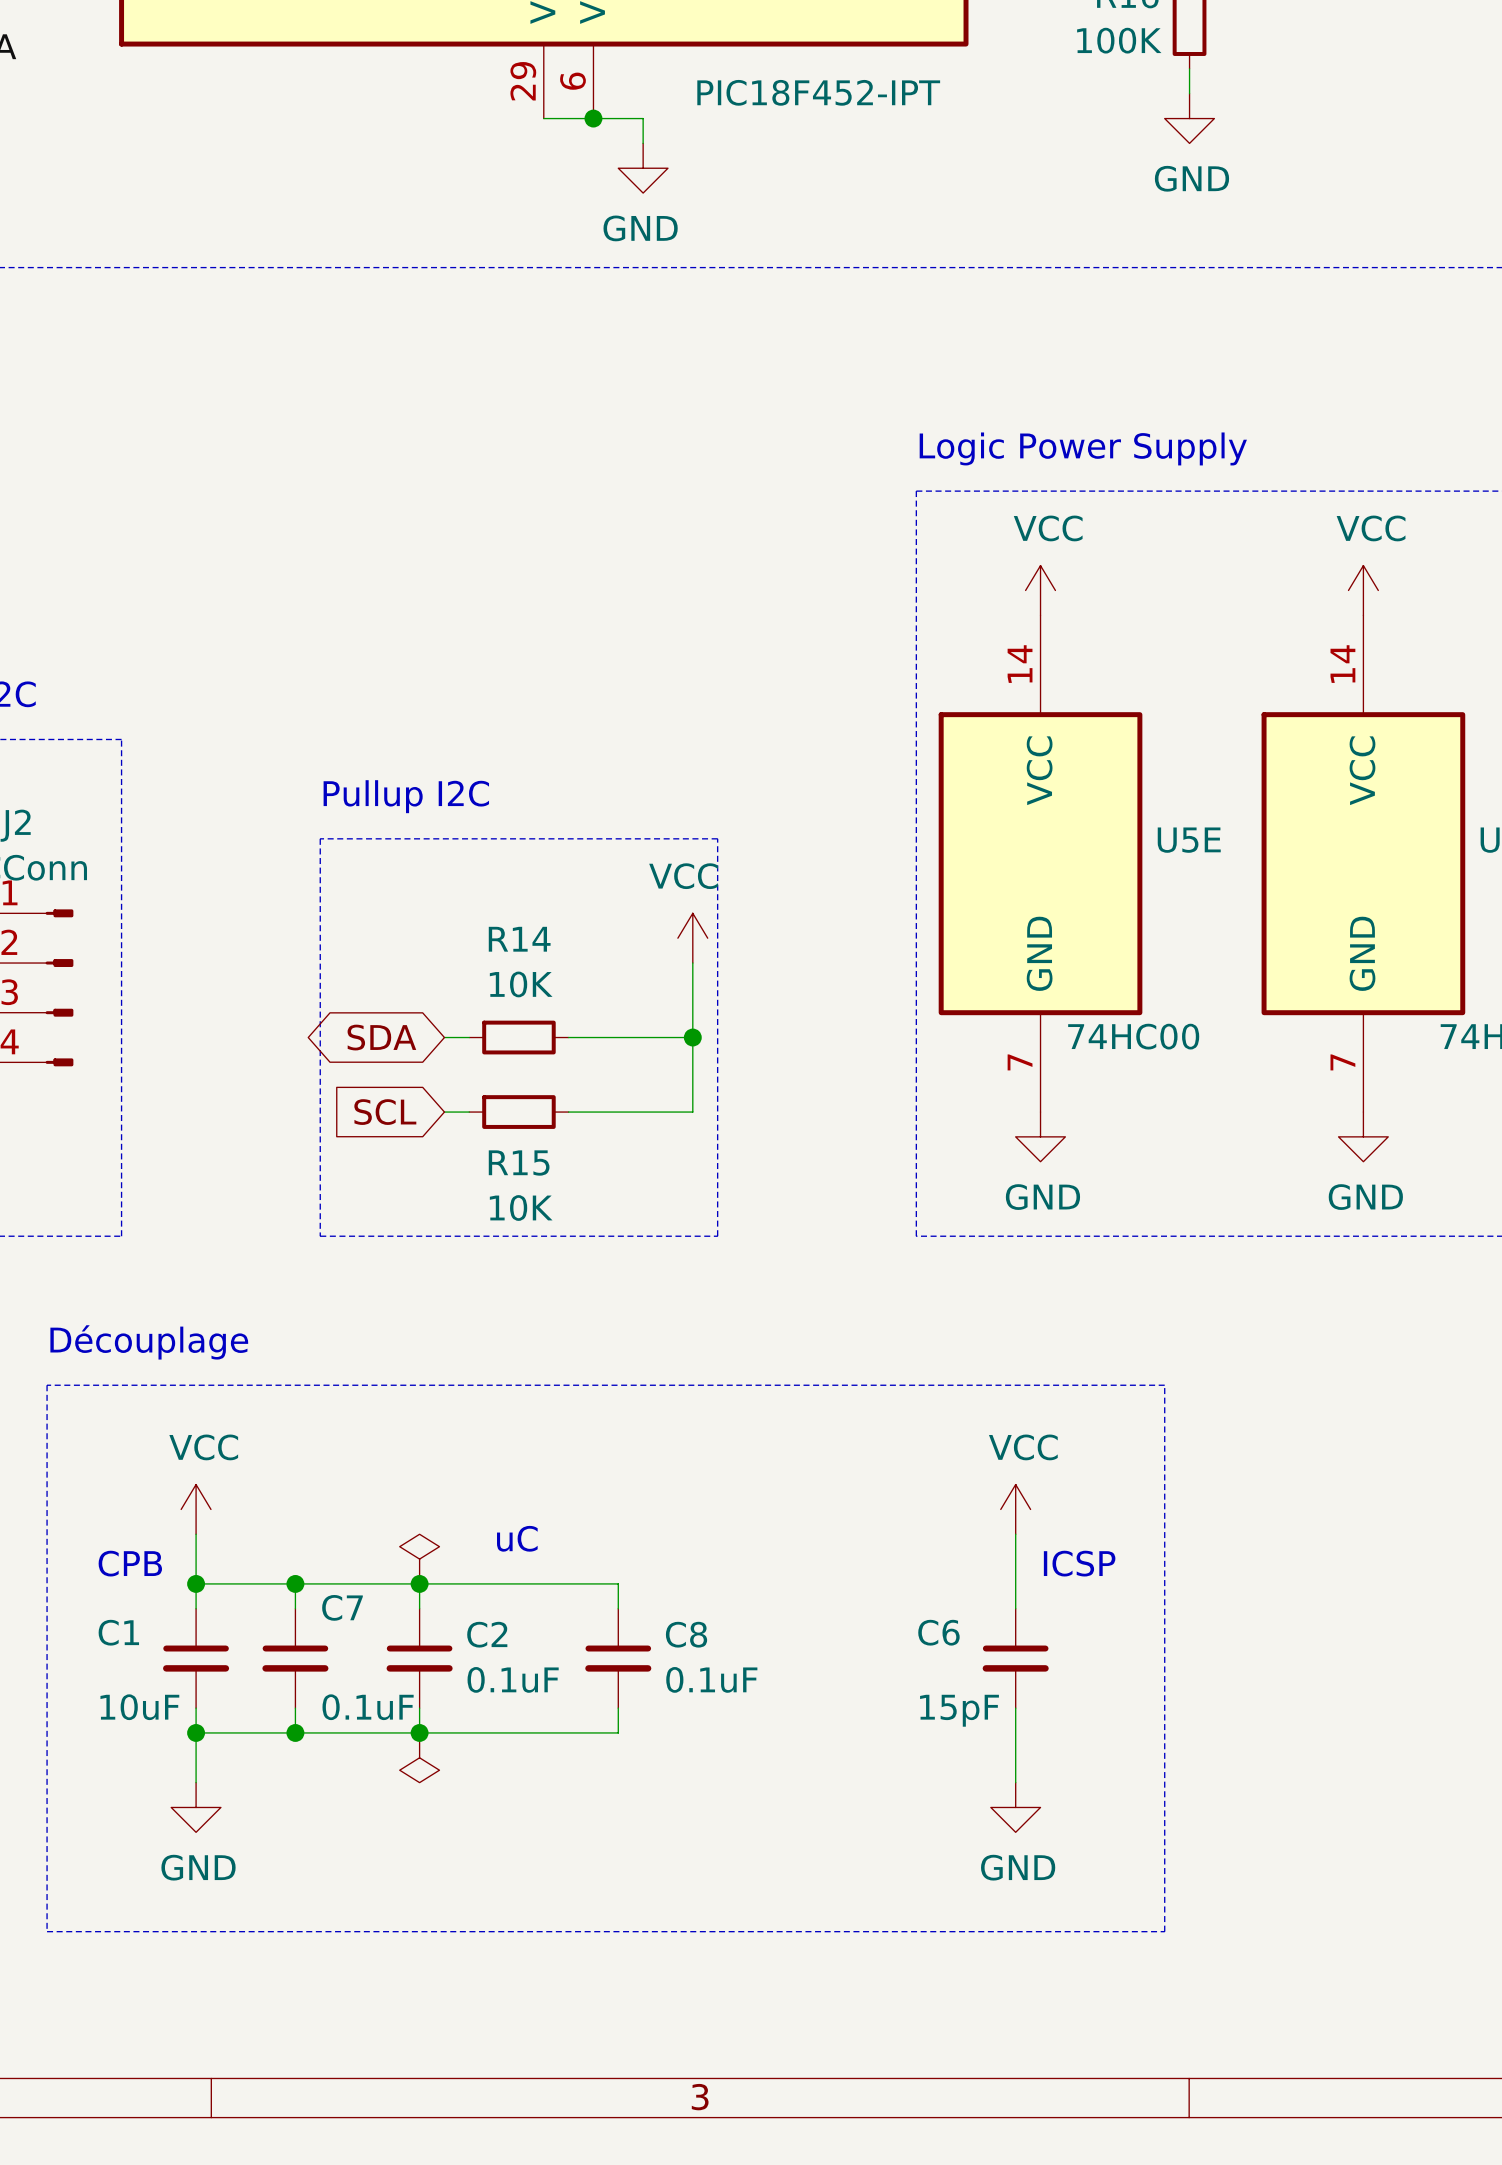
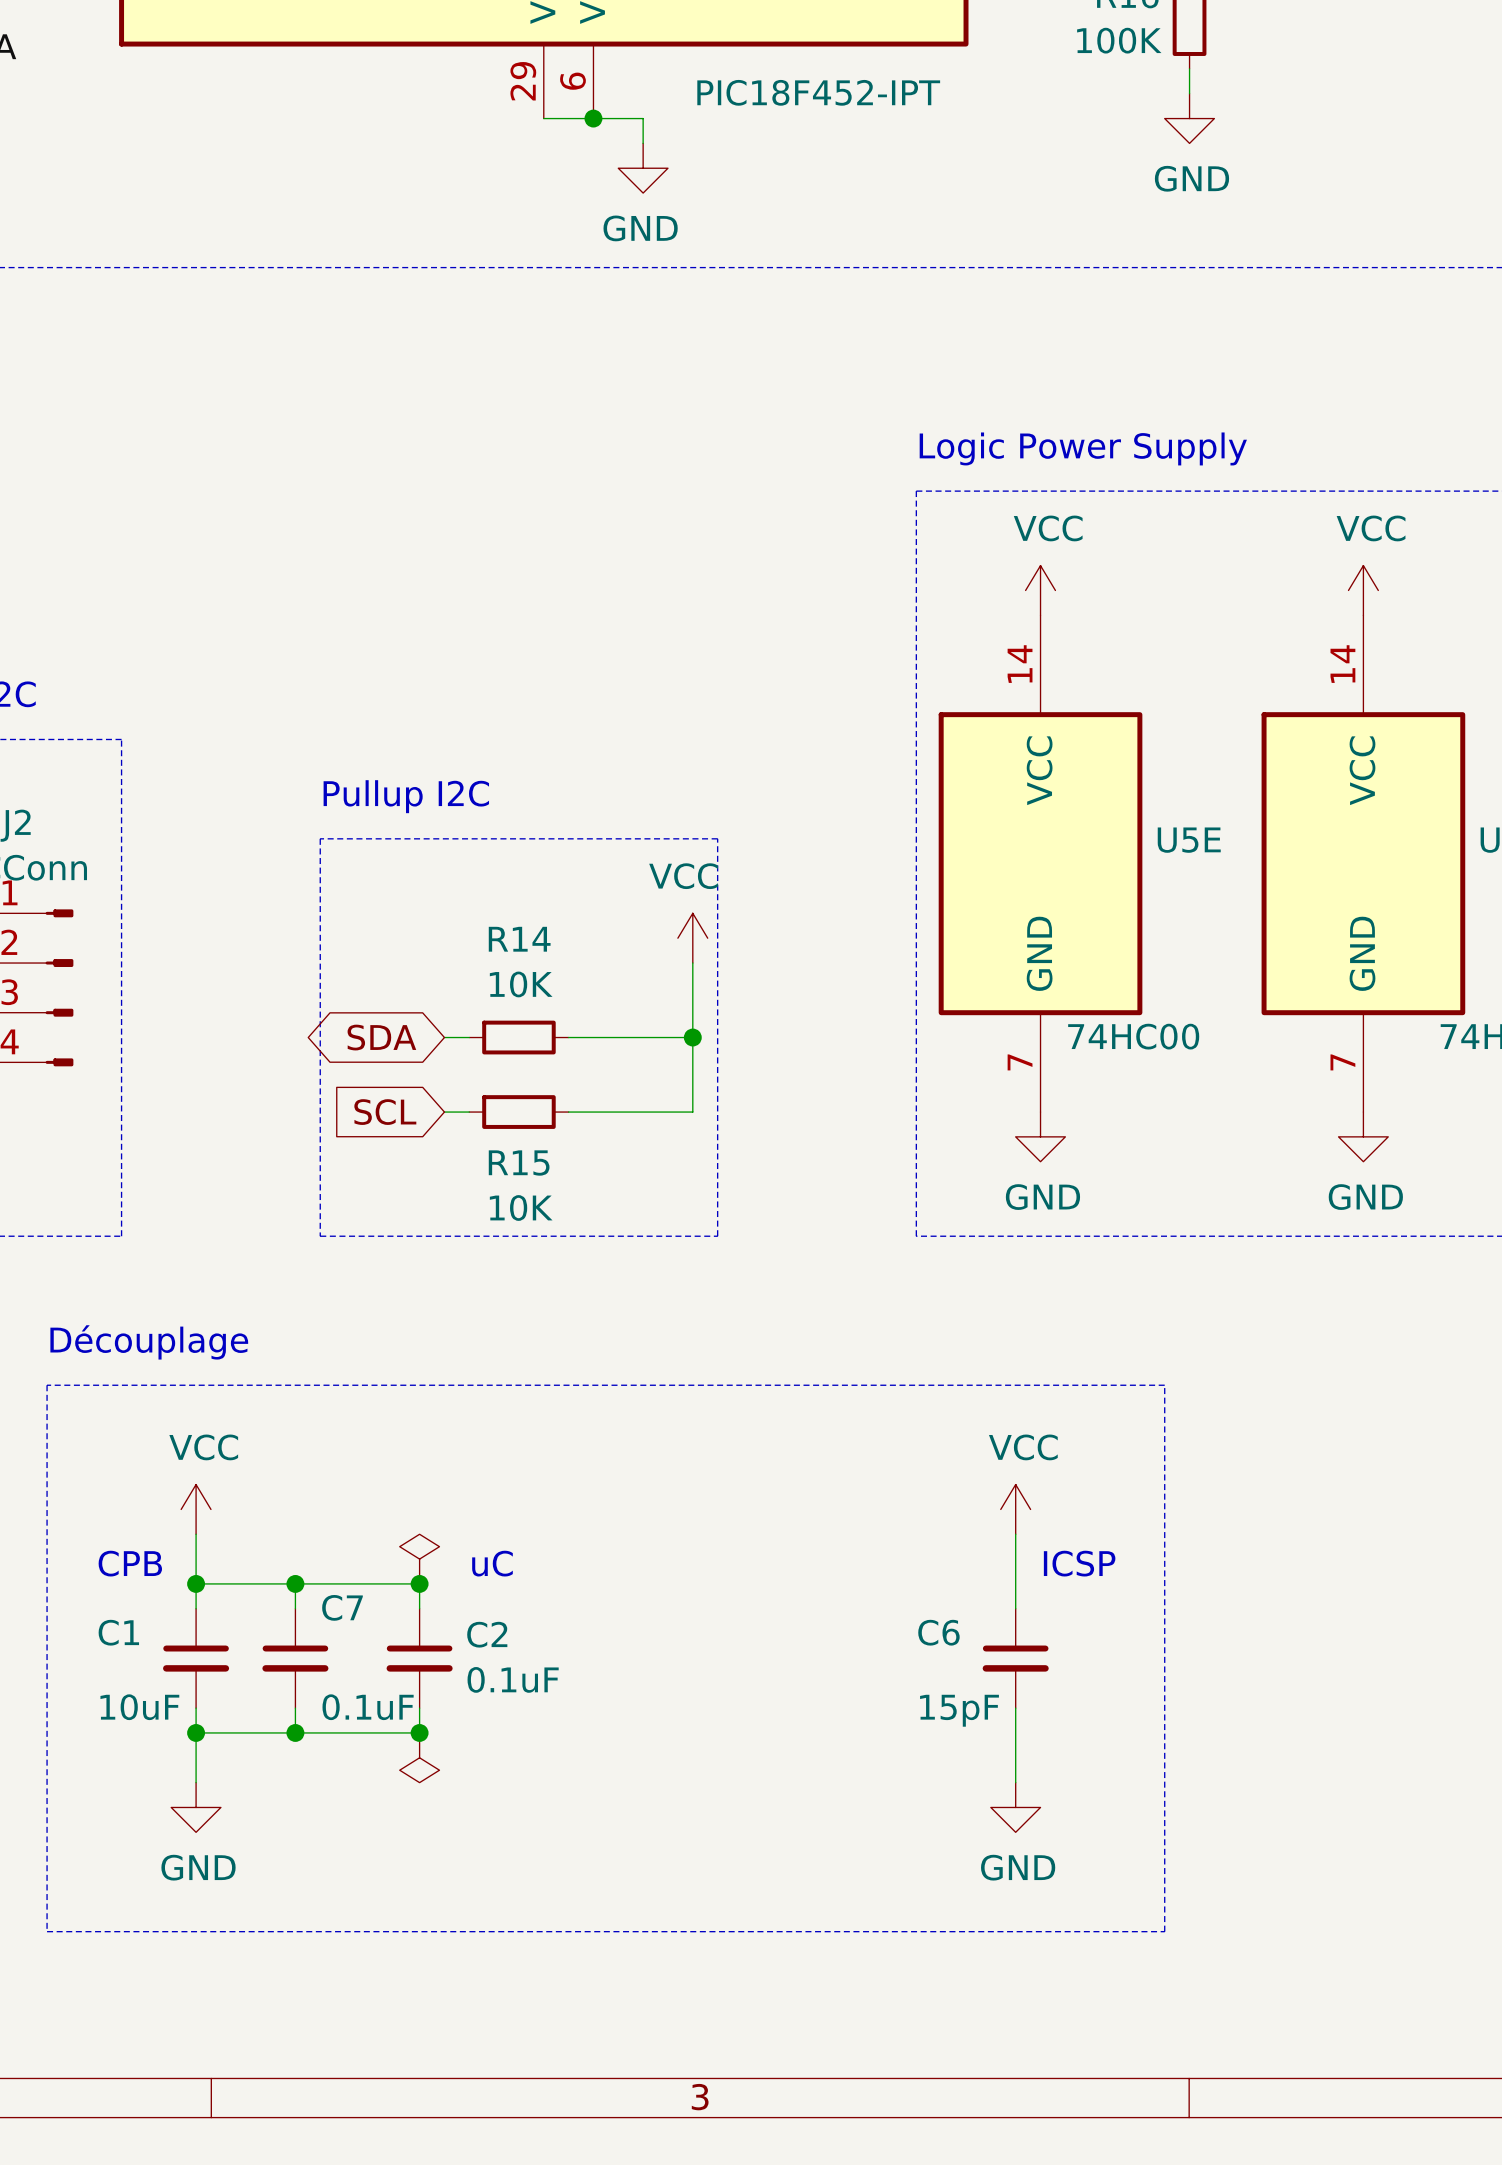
text position: uC (517, 1538) -> uC (492, 1563)
wire: (419, 1583) (618, 1583) (618, 1608) -> none
C8: 0.1uF (618, 1658) -> none
wire: (618, 1708) (618, 1732) (419, 1732) -> none

